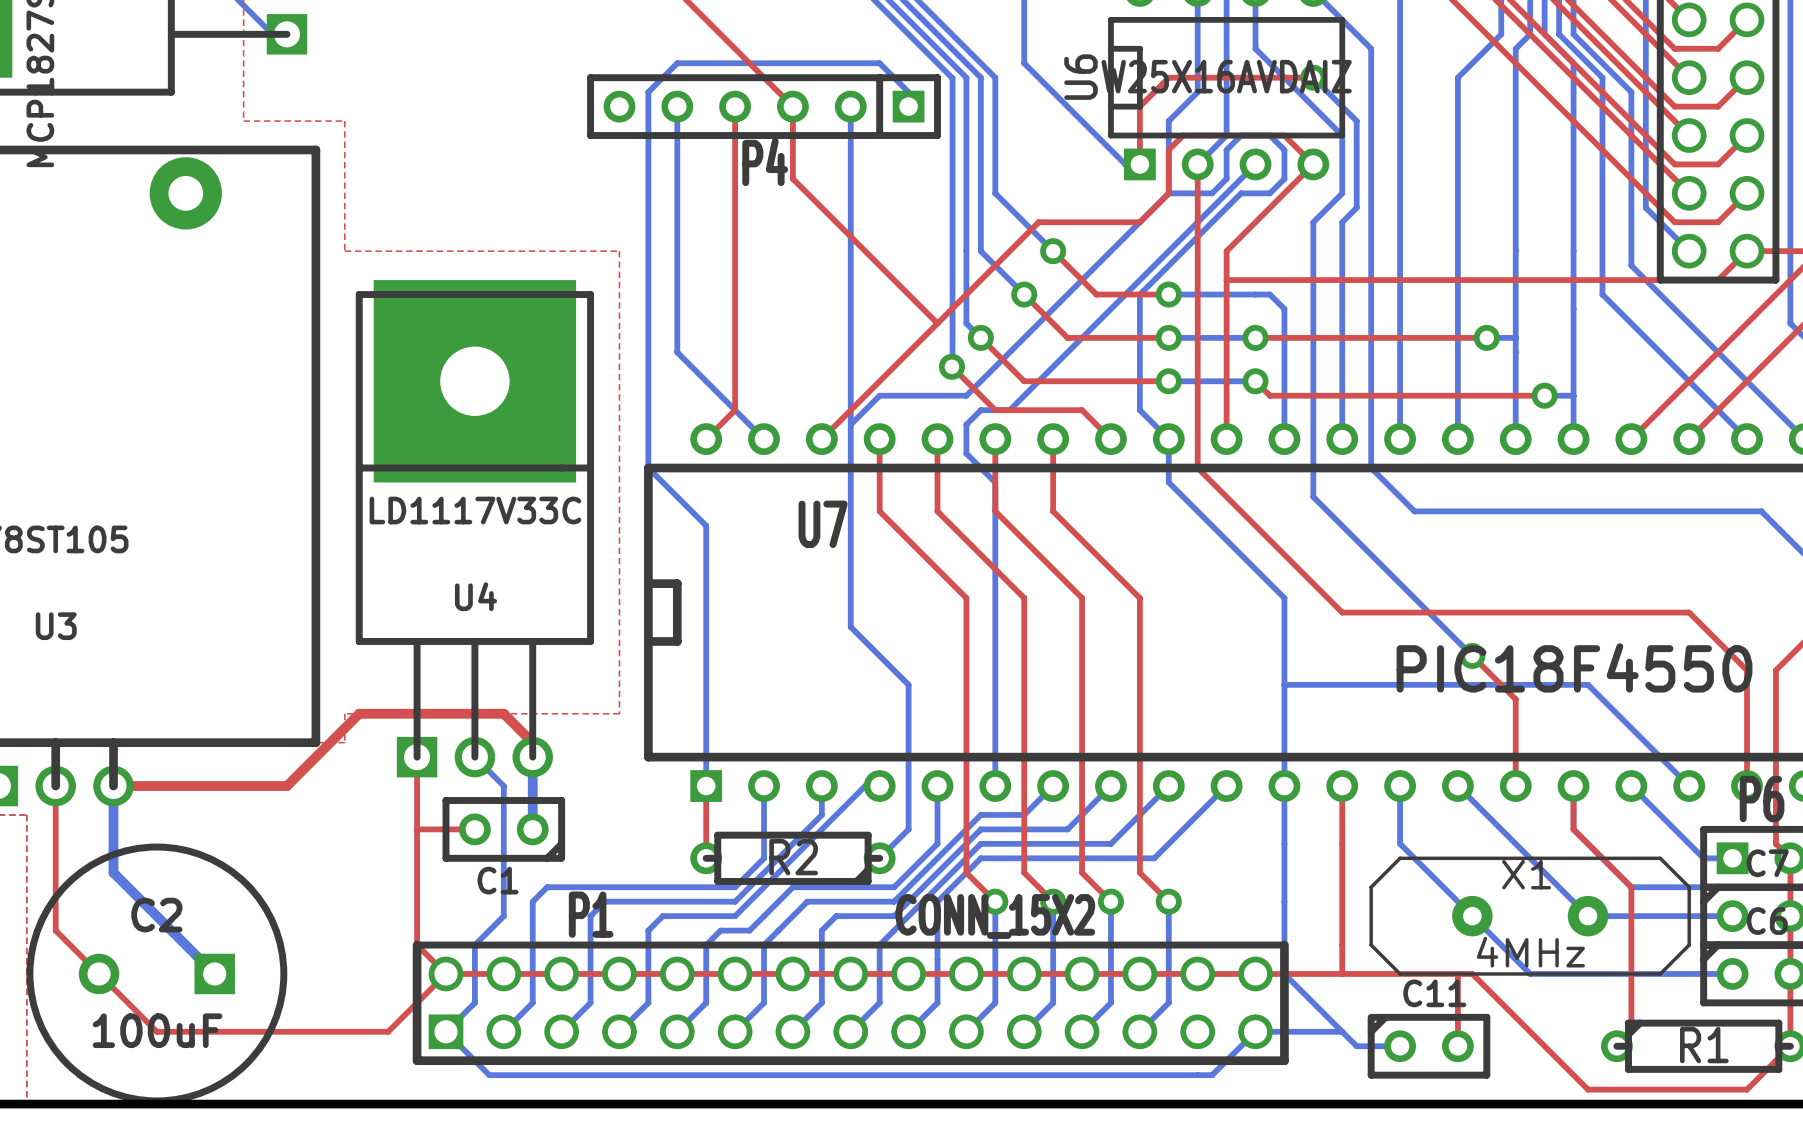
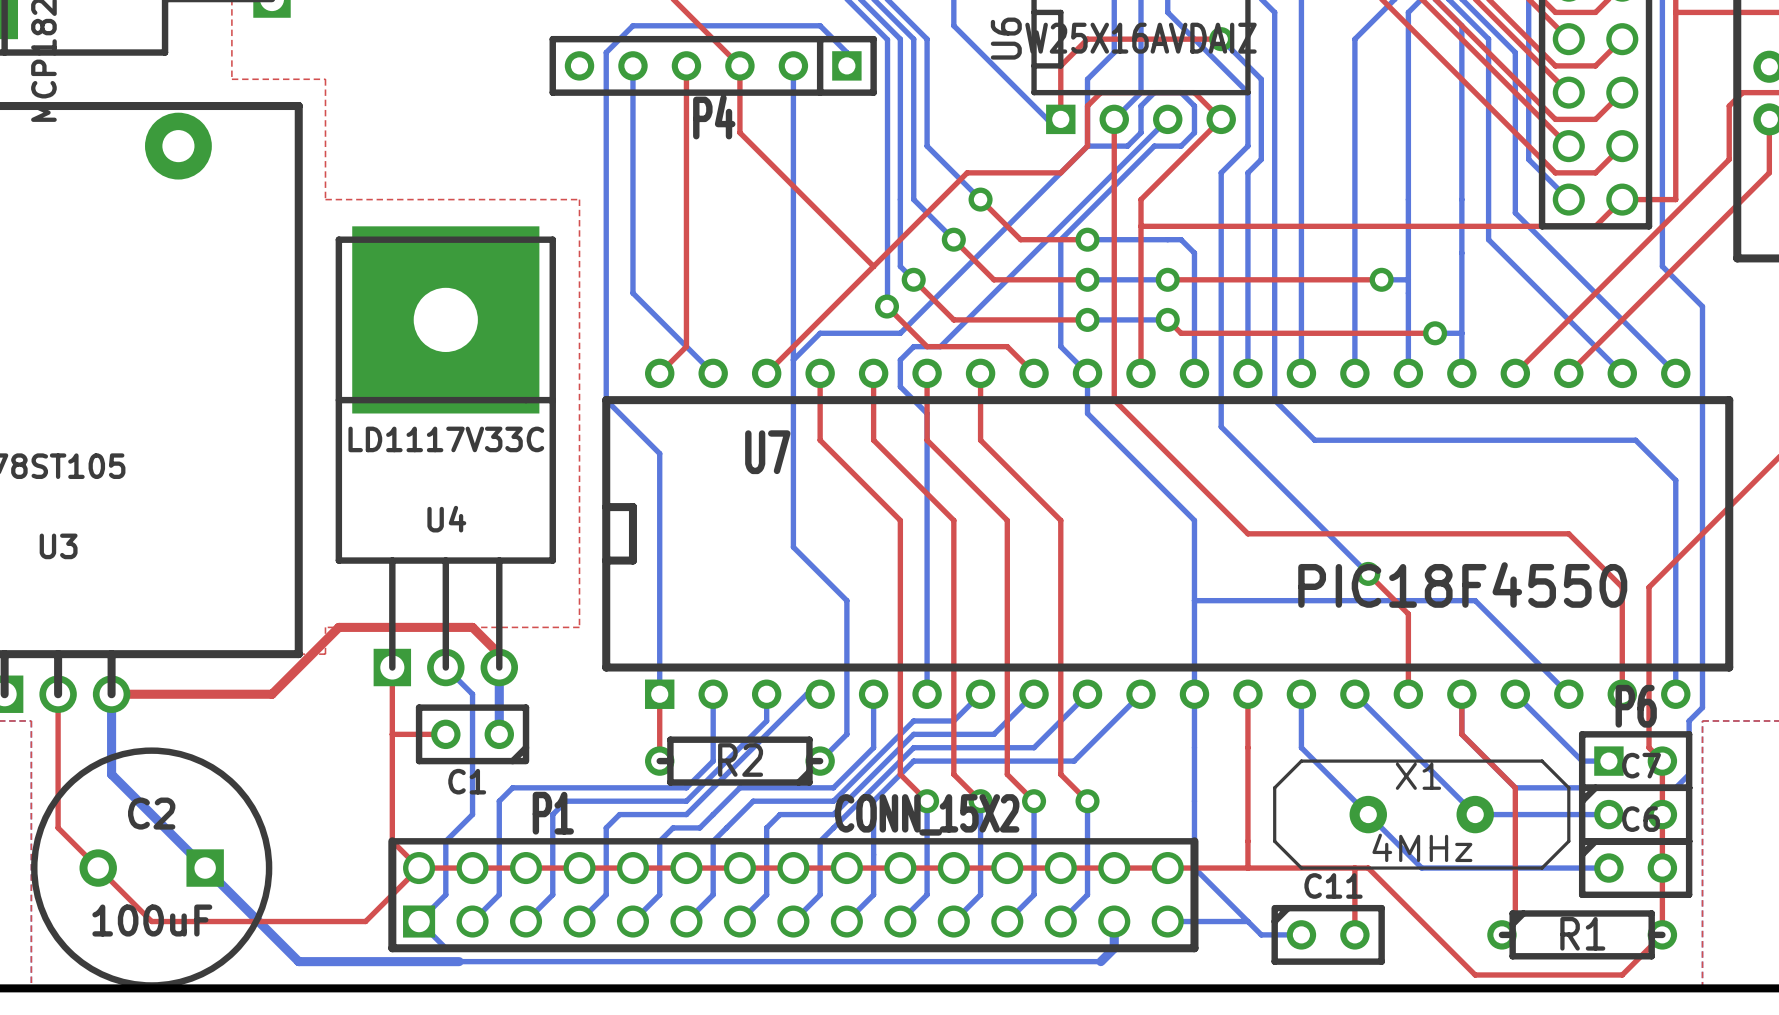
bottom track: (1255, 1031) (1212, 1075) (1183, 1075) -> (1114, 921) (1114, 948) (1100, 961)
bottom track: (474, 1060) (489, 1075) -> (205, 868) (298, 961) (459, 961)

